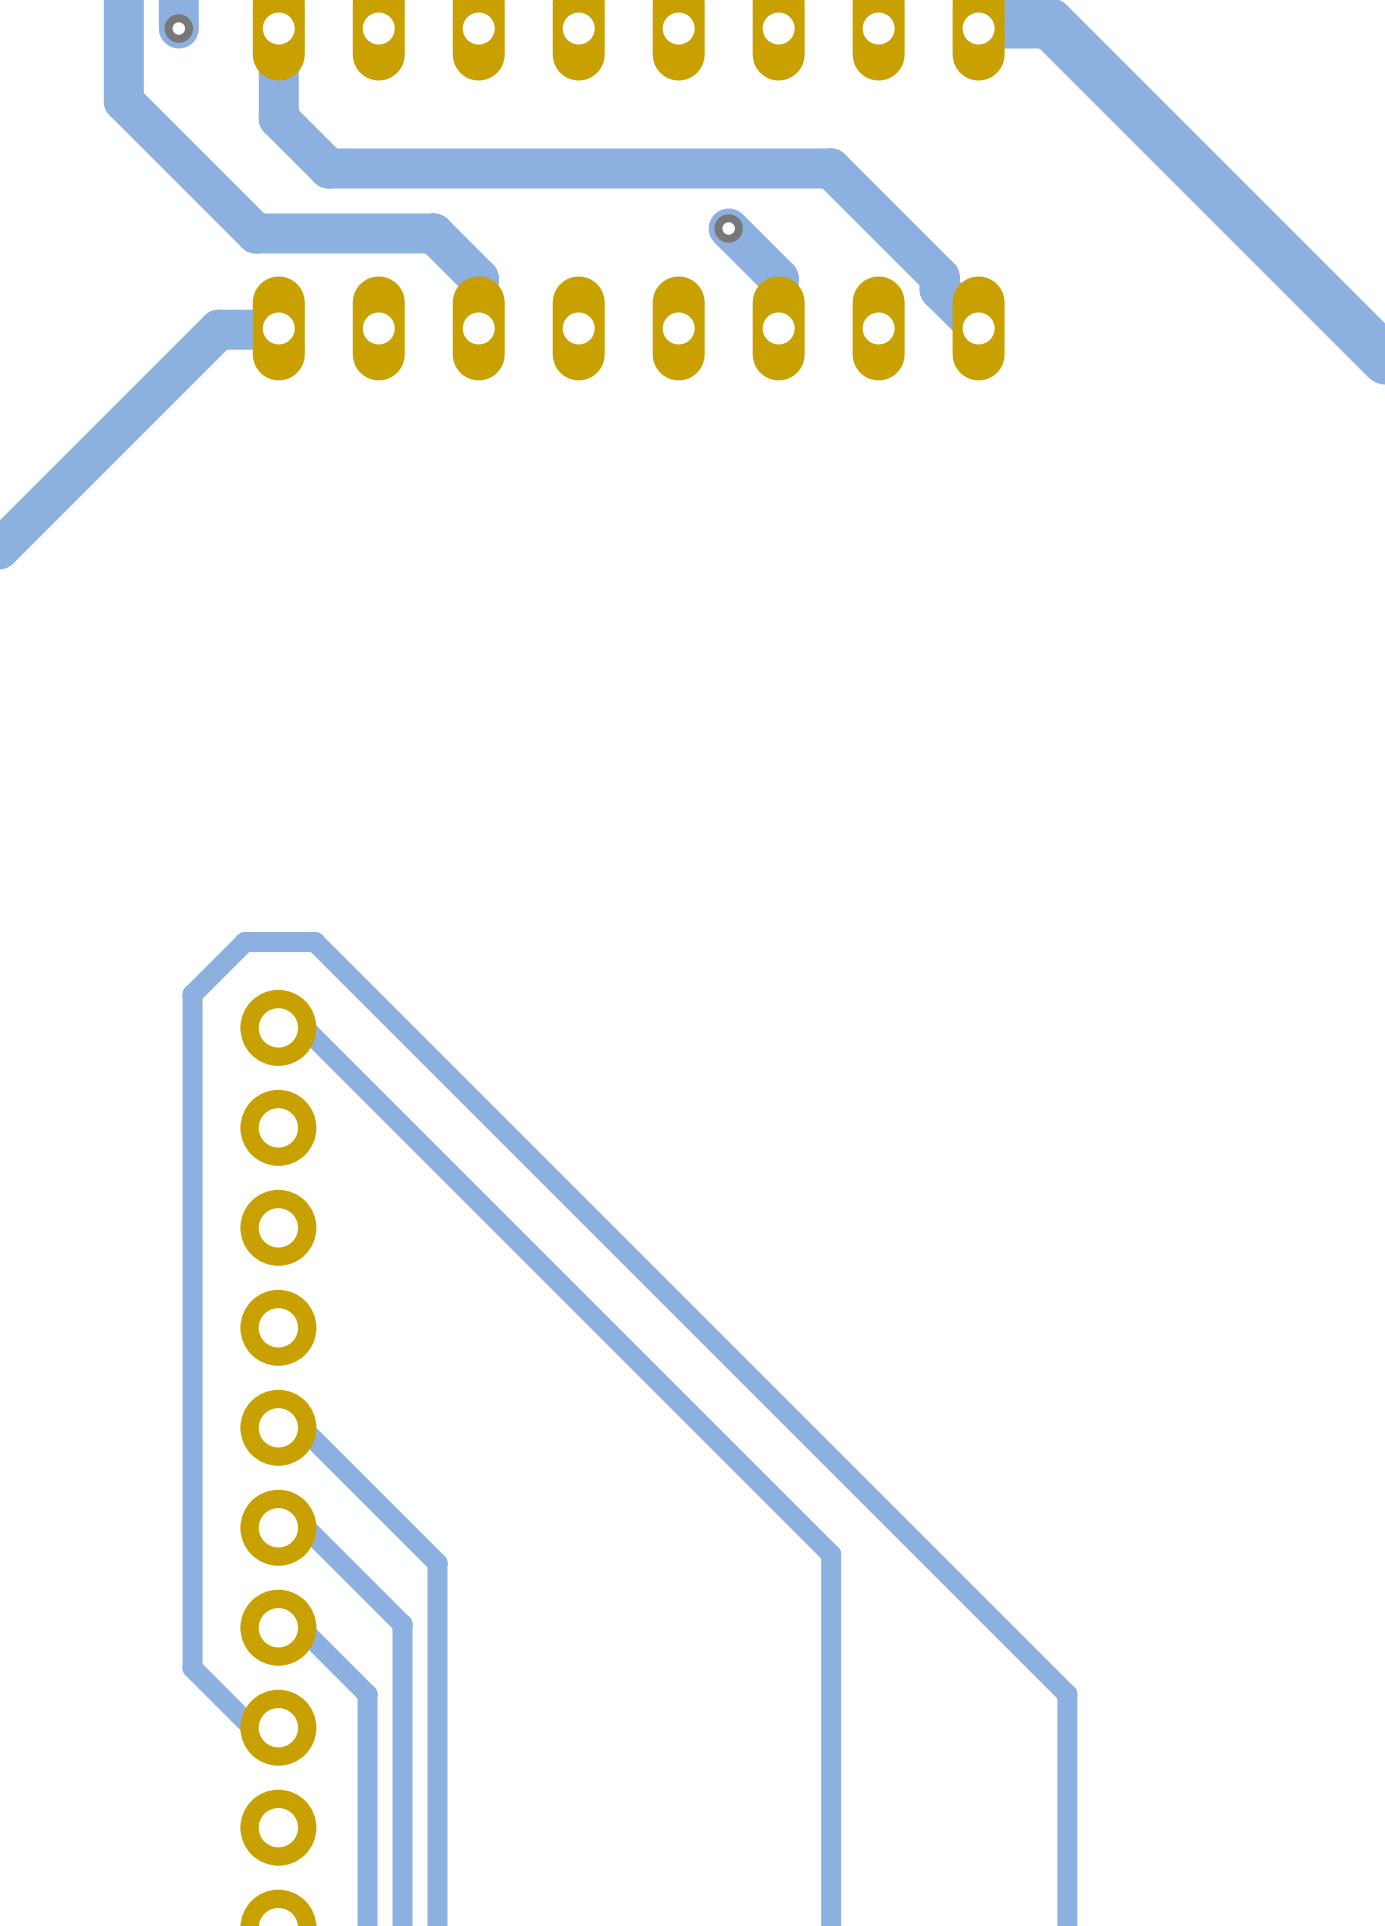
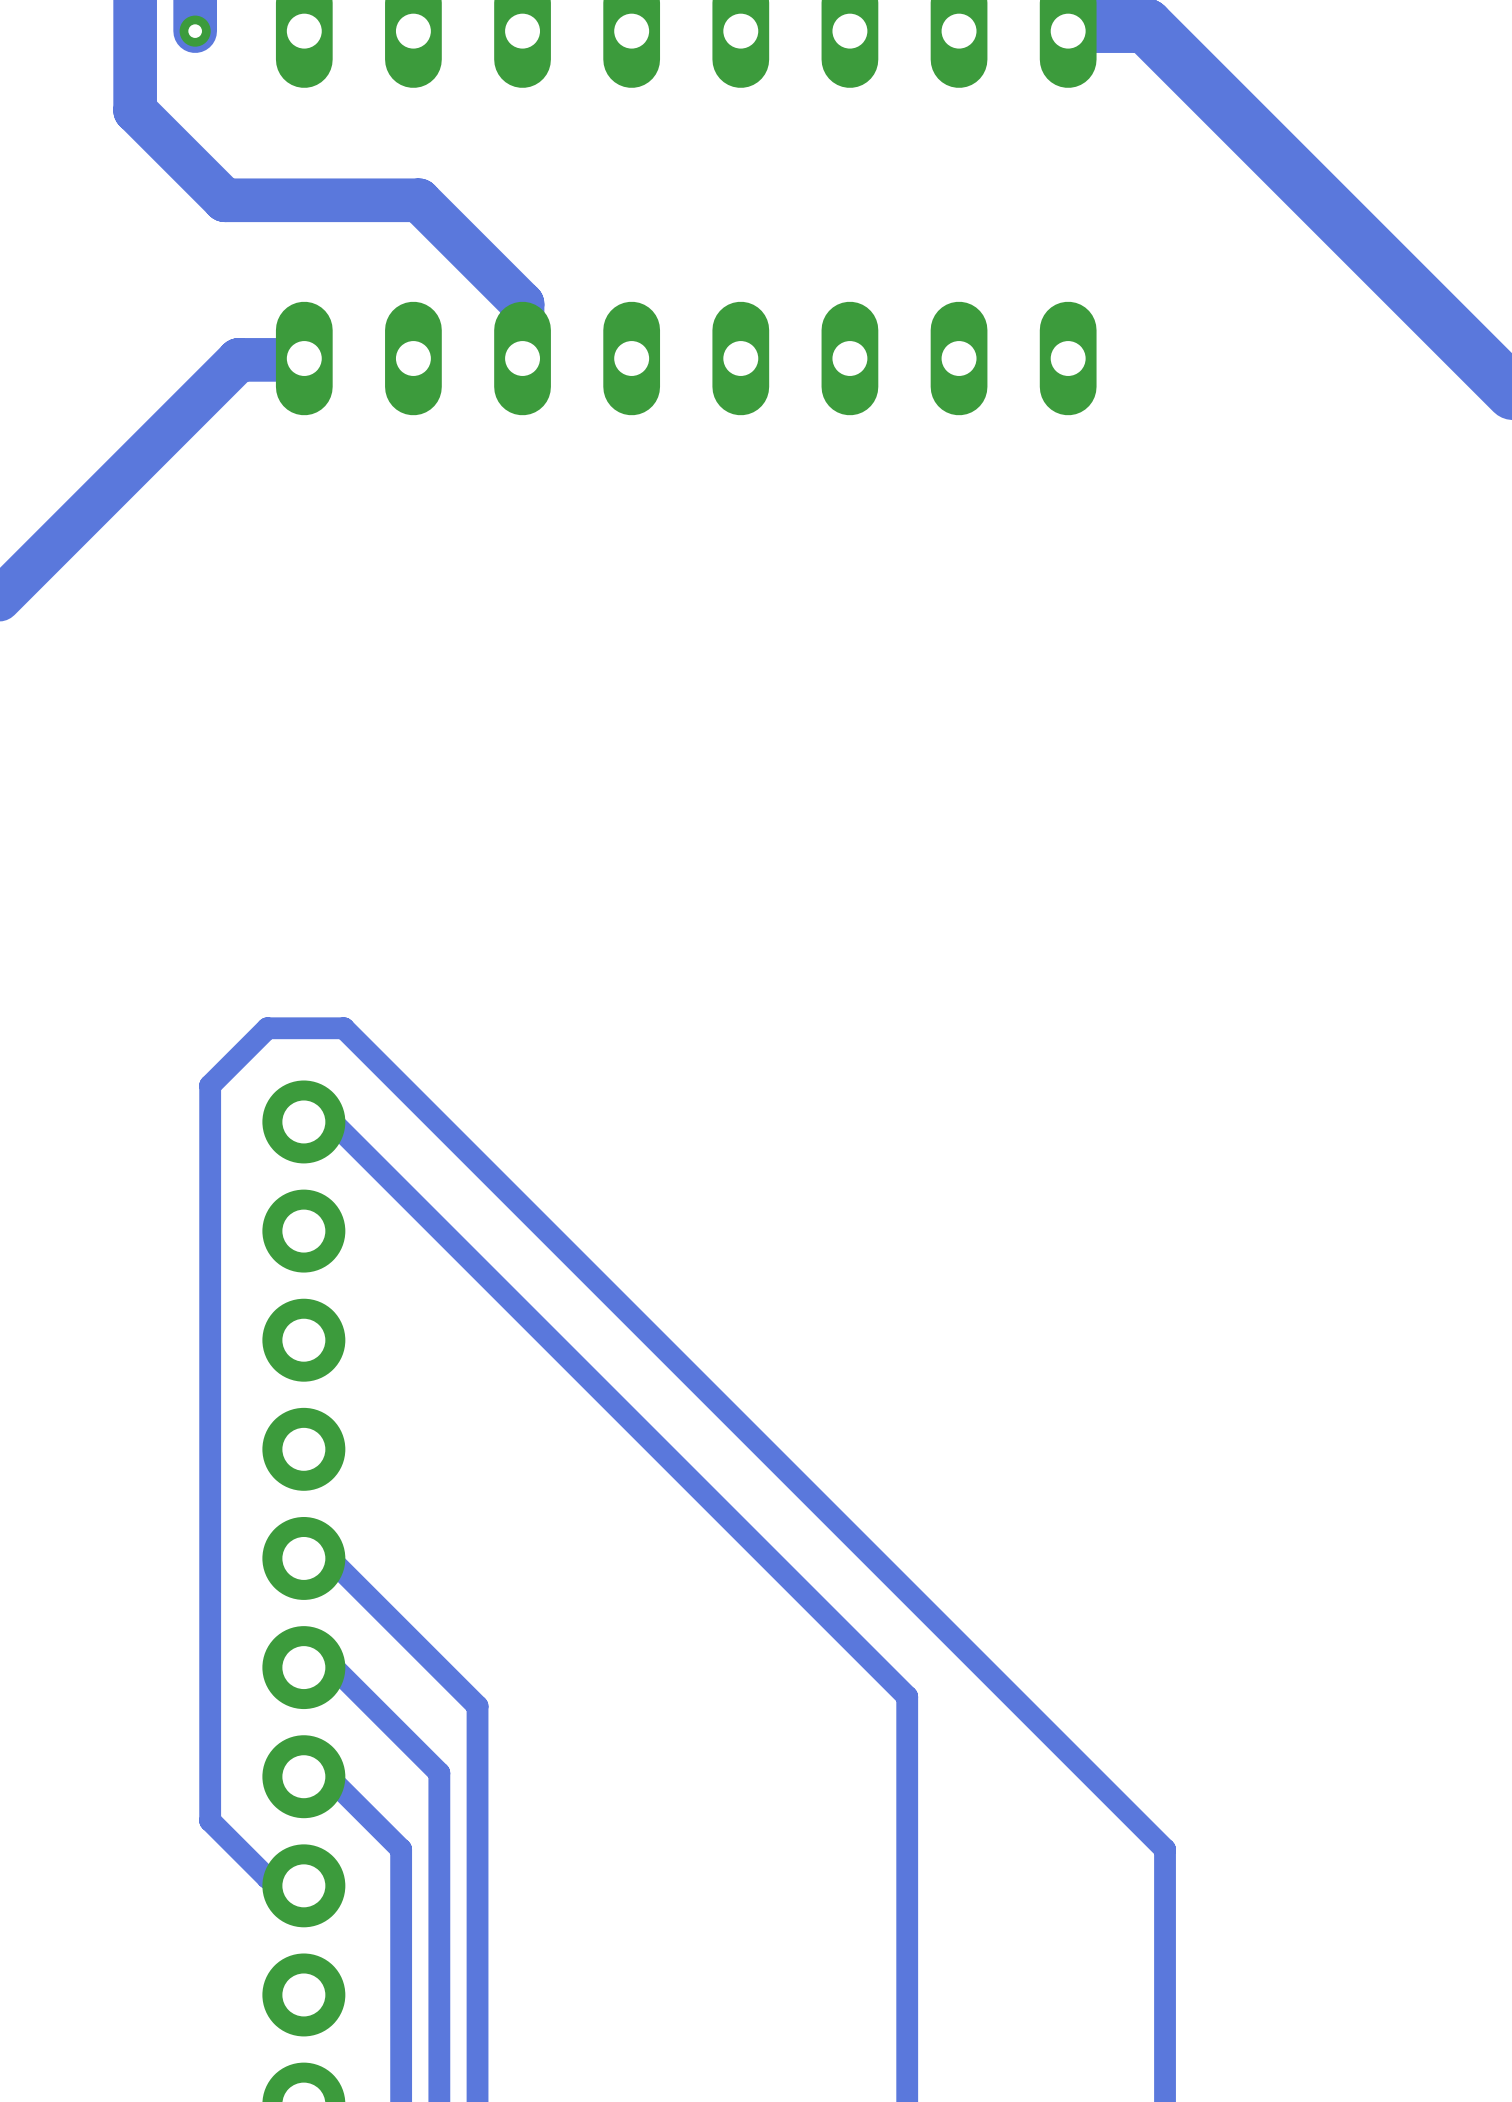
track: (278, 28) (278, 118) (328, 168) (830, 168) (939, 277) (939, 289) (978, 328) -> none
track: (206, 183) (256, 233) (433, 233) -> (224, 200) (418, 200) (473, 254)
track: (728, 228) (778, 278) (778, 328) -> none
via: (728, 228) -> none

